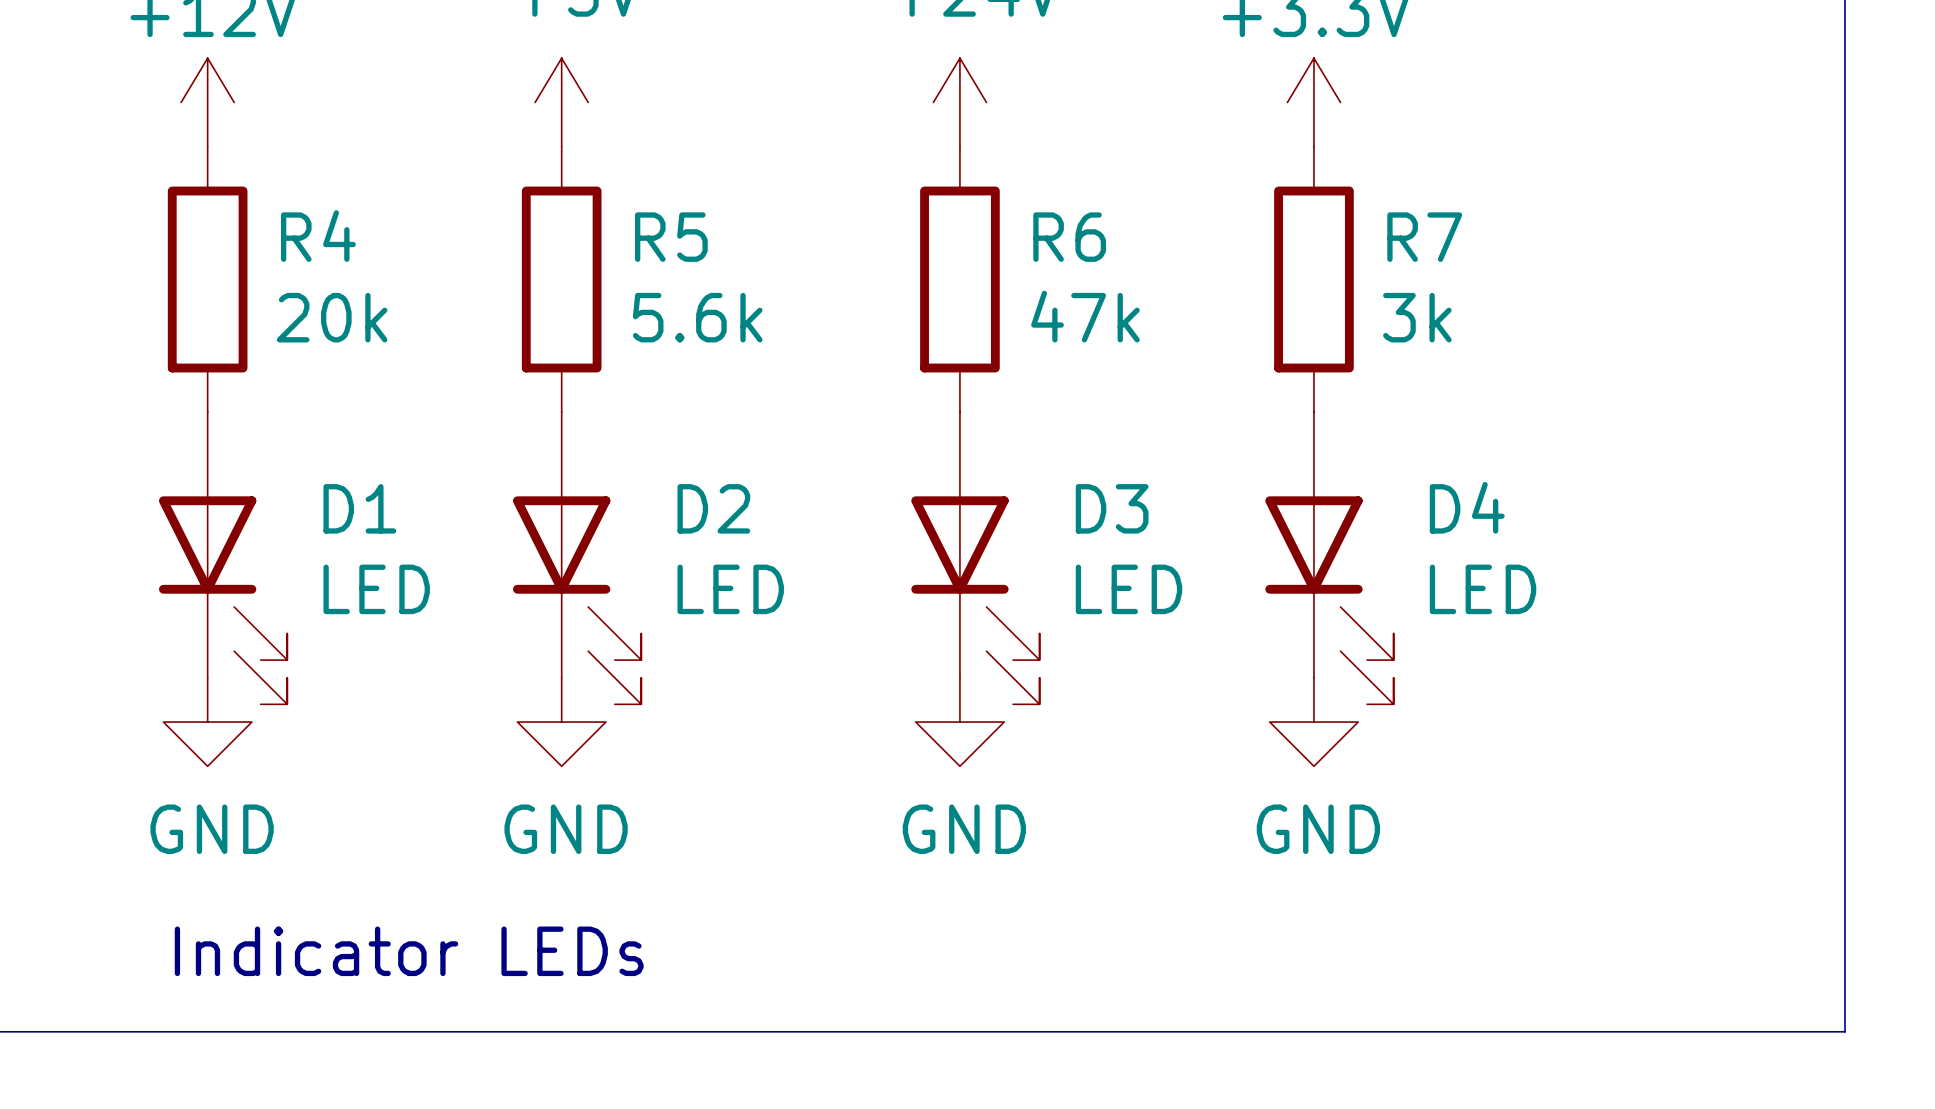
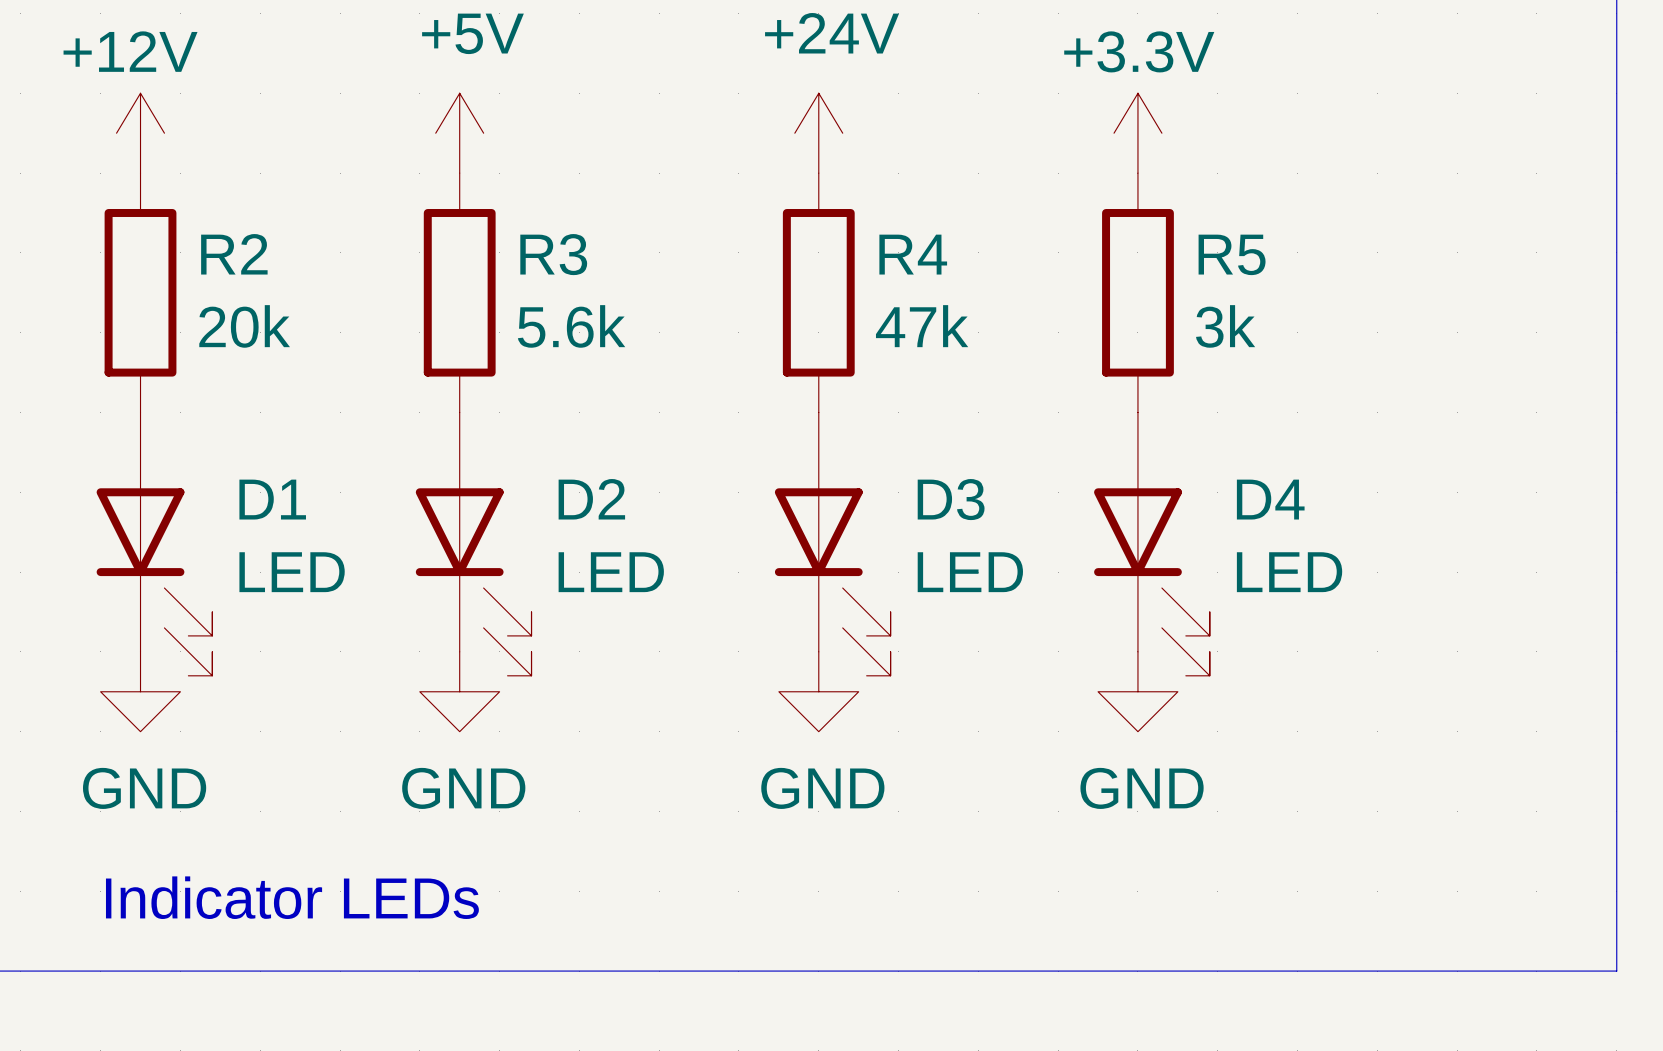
R4 name: R4 (318, 236) -> R2 (234, 254)
R5 name: R5 (671, 237) -> R3 (553, 254)
R6 name: R6 (1069, 237) -> R4 (913, 254)
R7 name: R7 (1424, 237) -> R5 (1232, 254)

